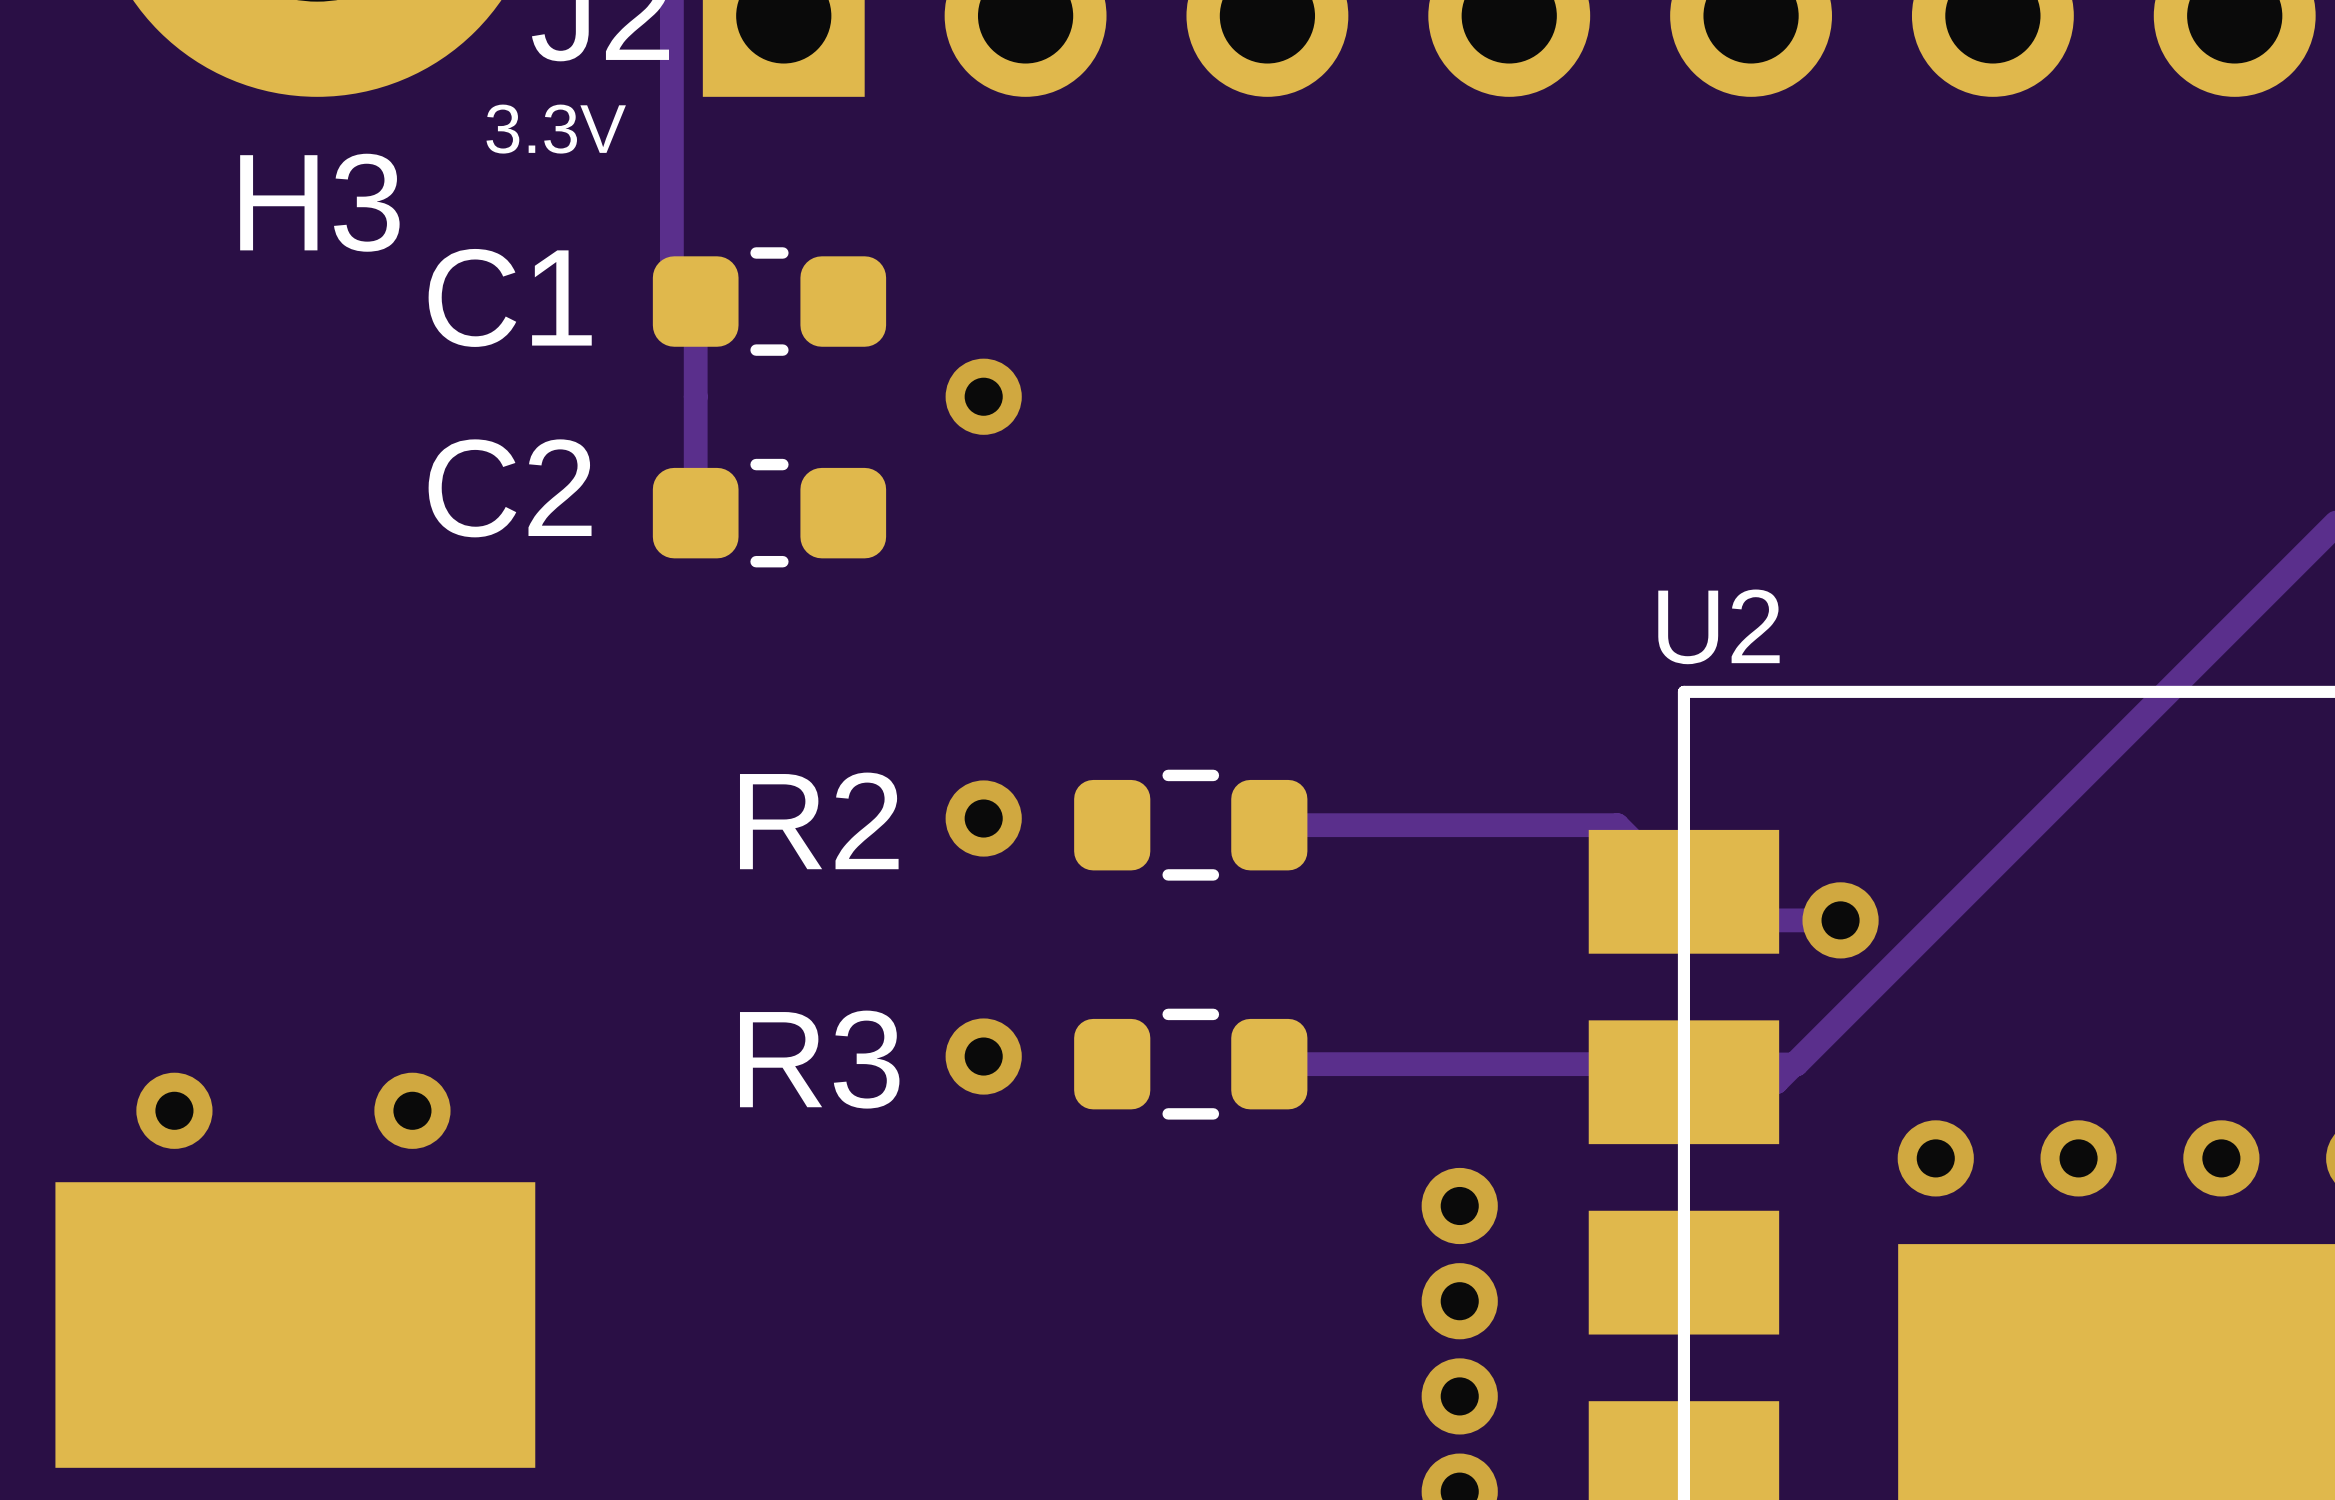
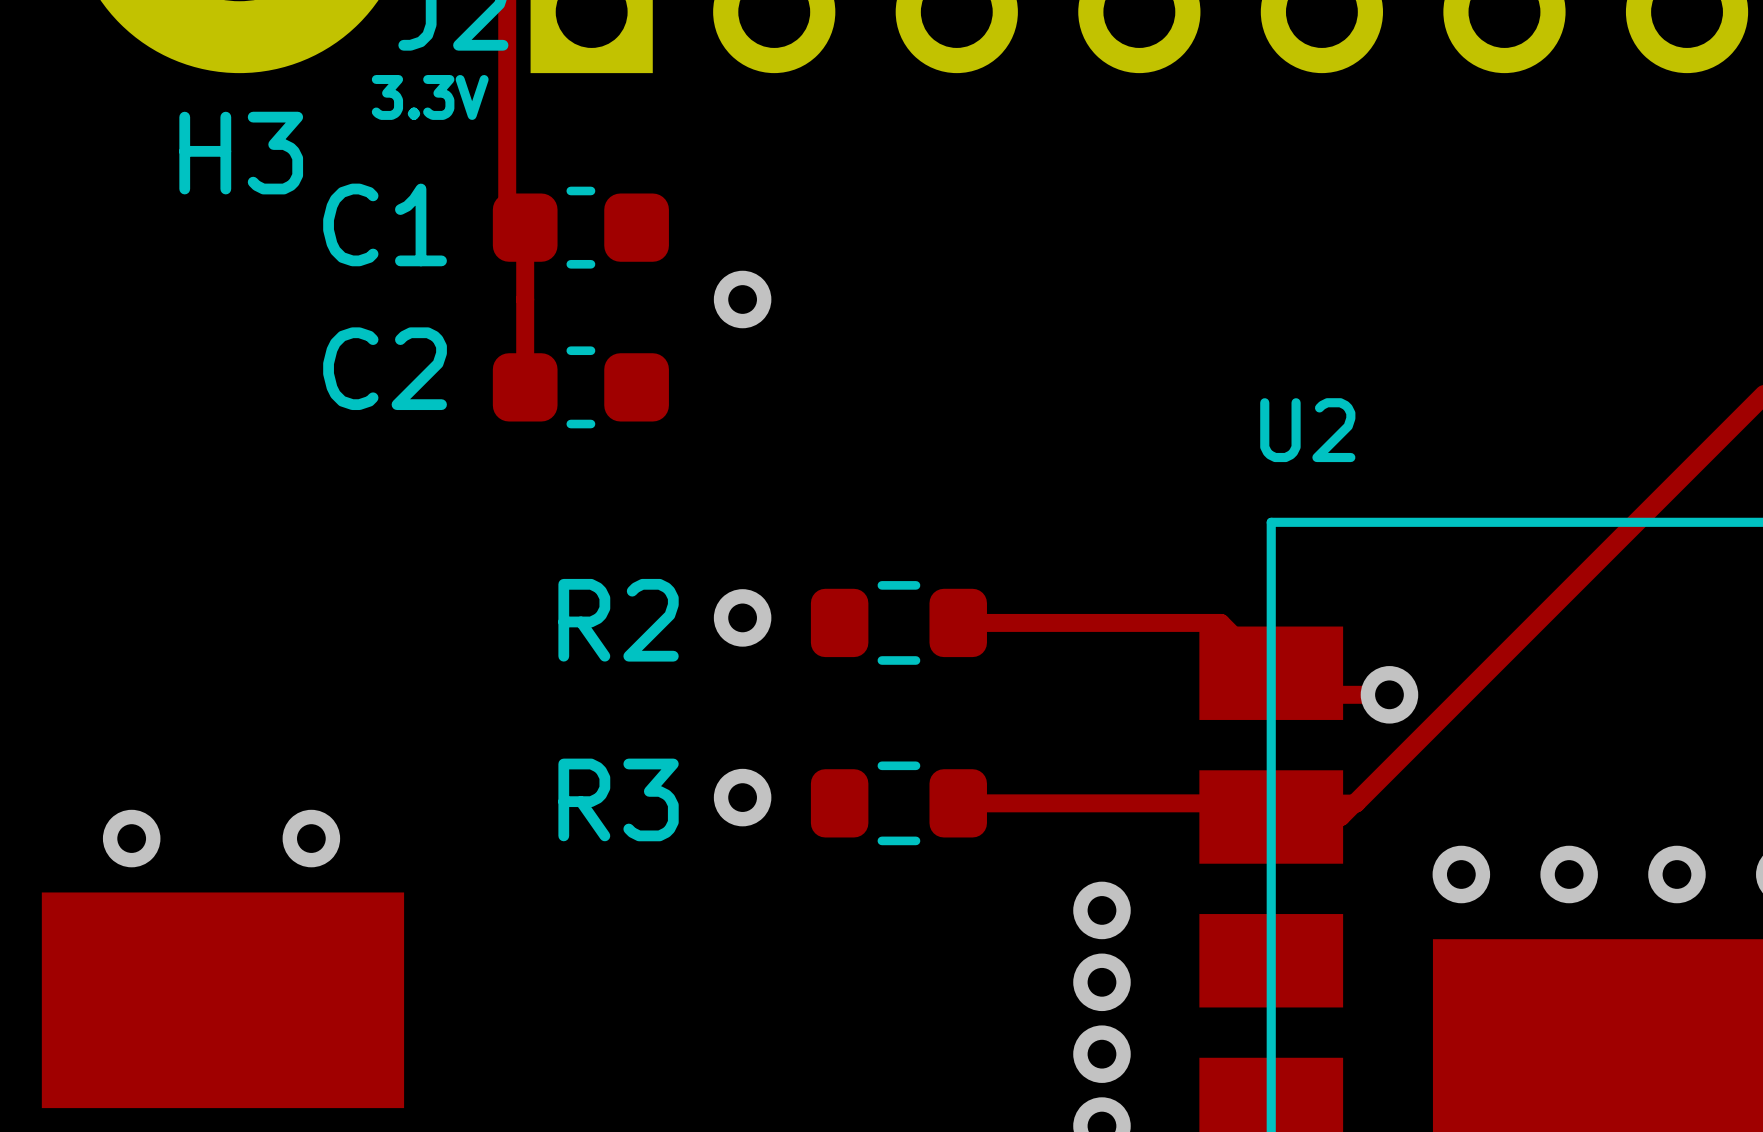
U2 name position: U2 (1718, 626) -> U2 (1307, 430)

